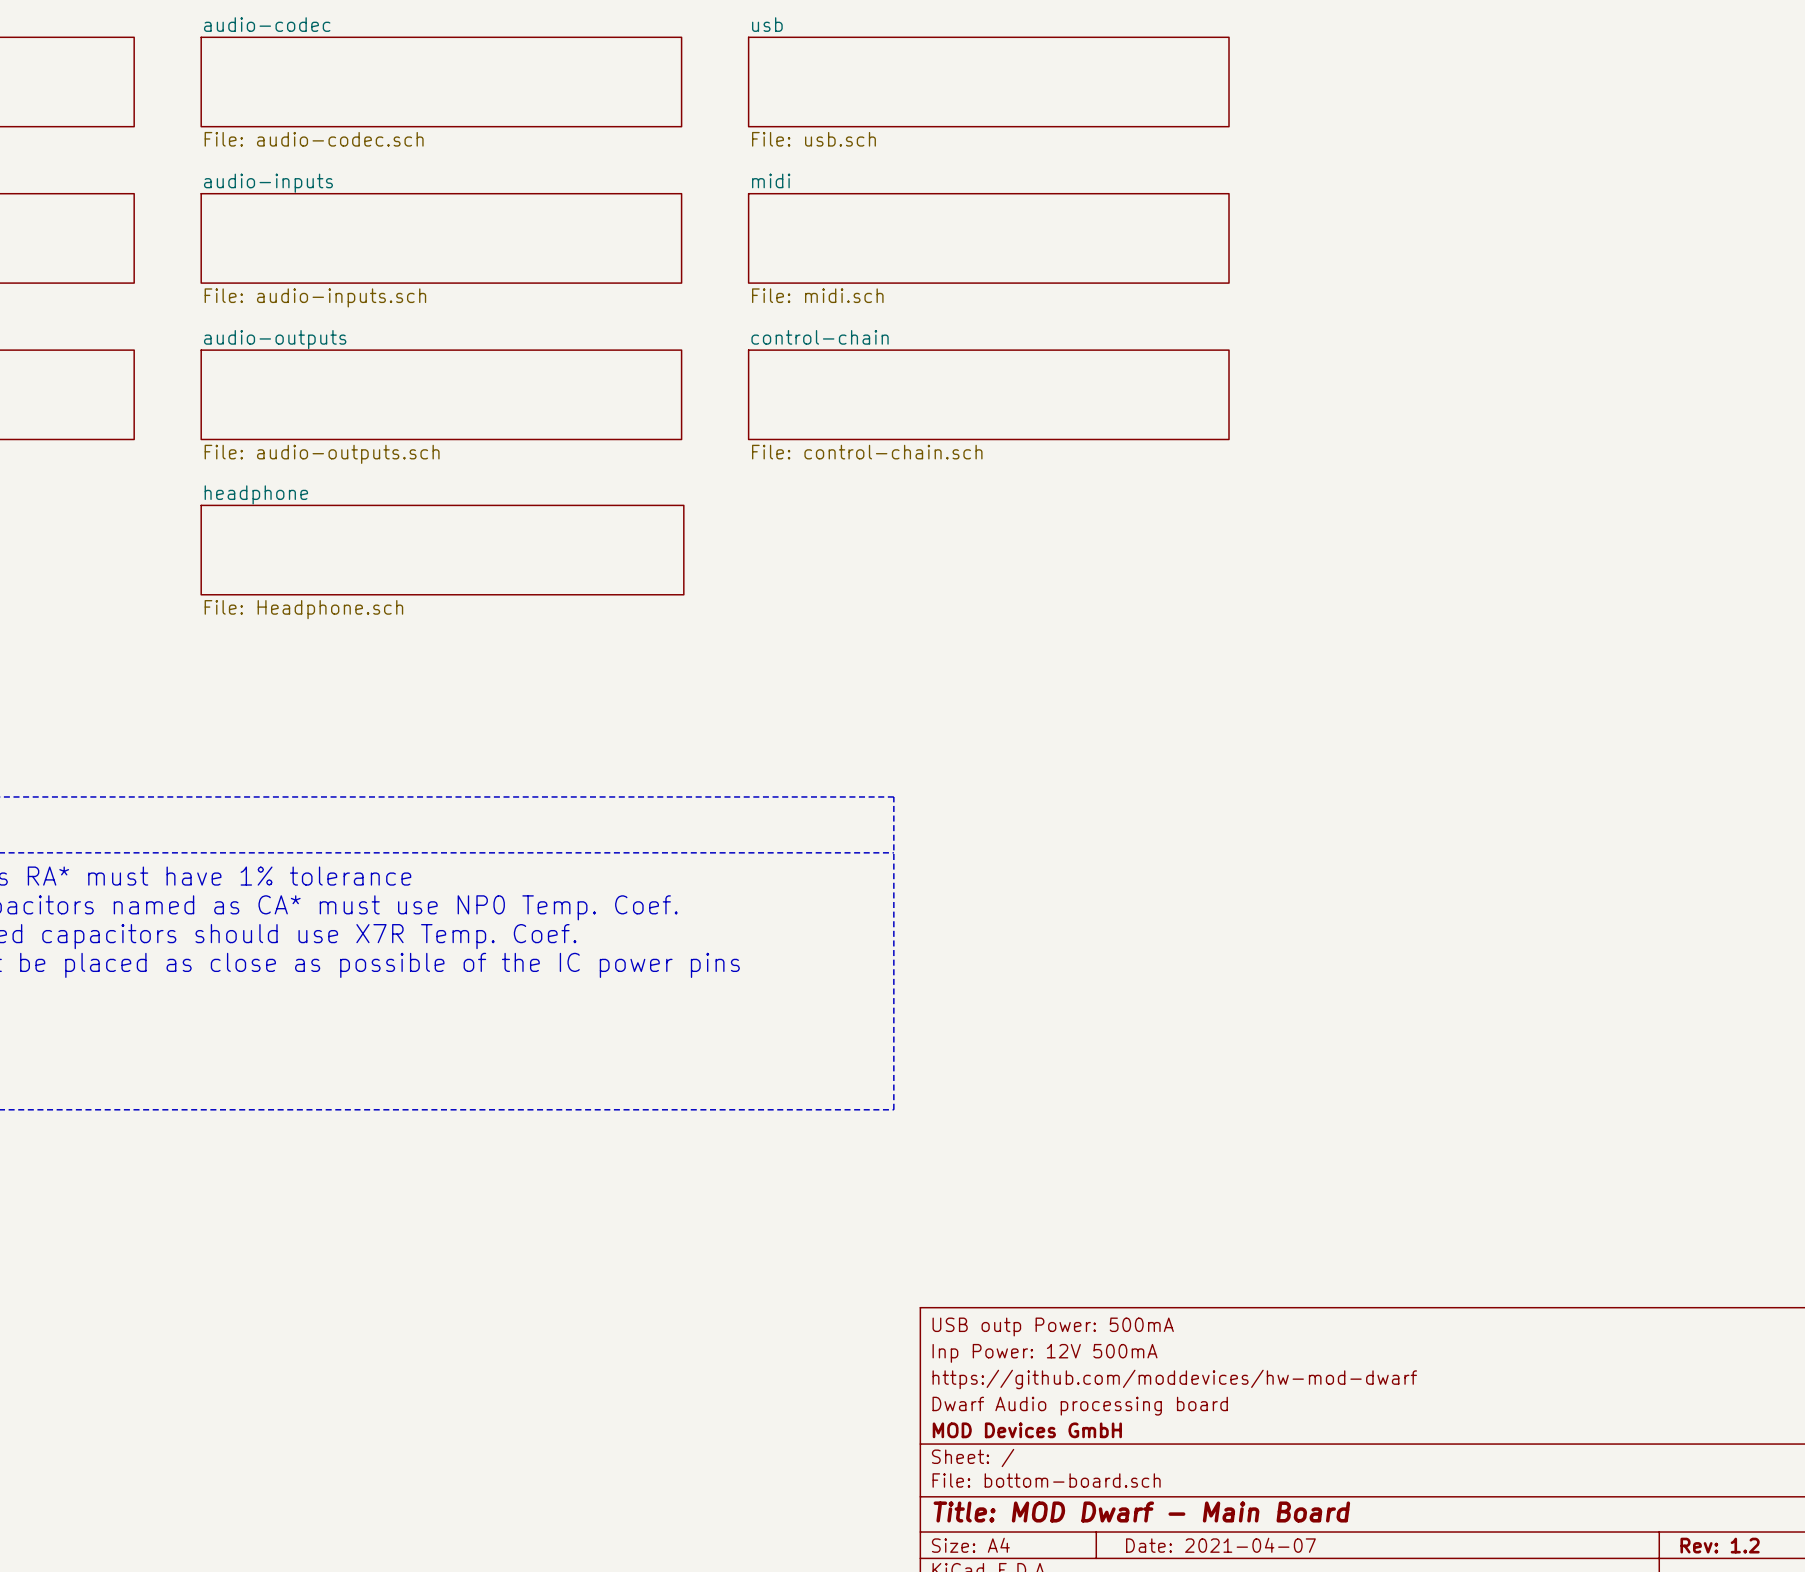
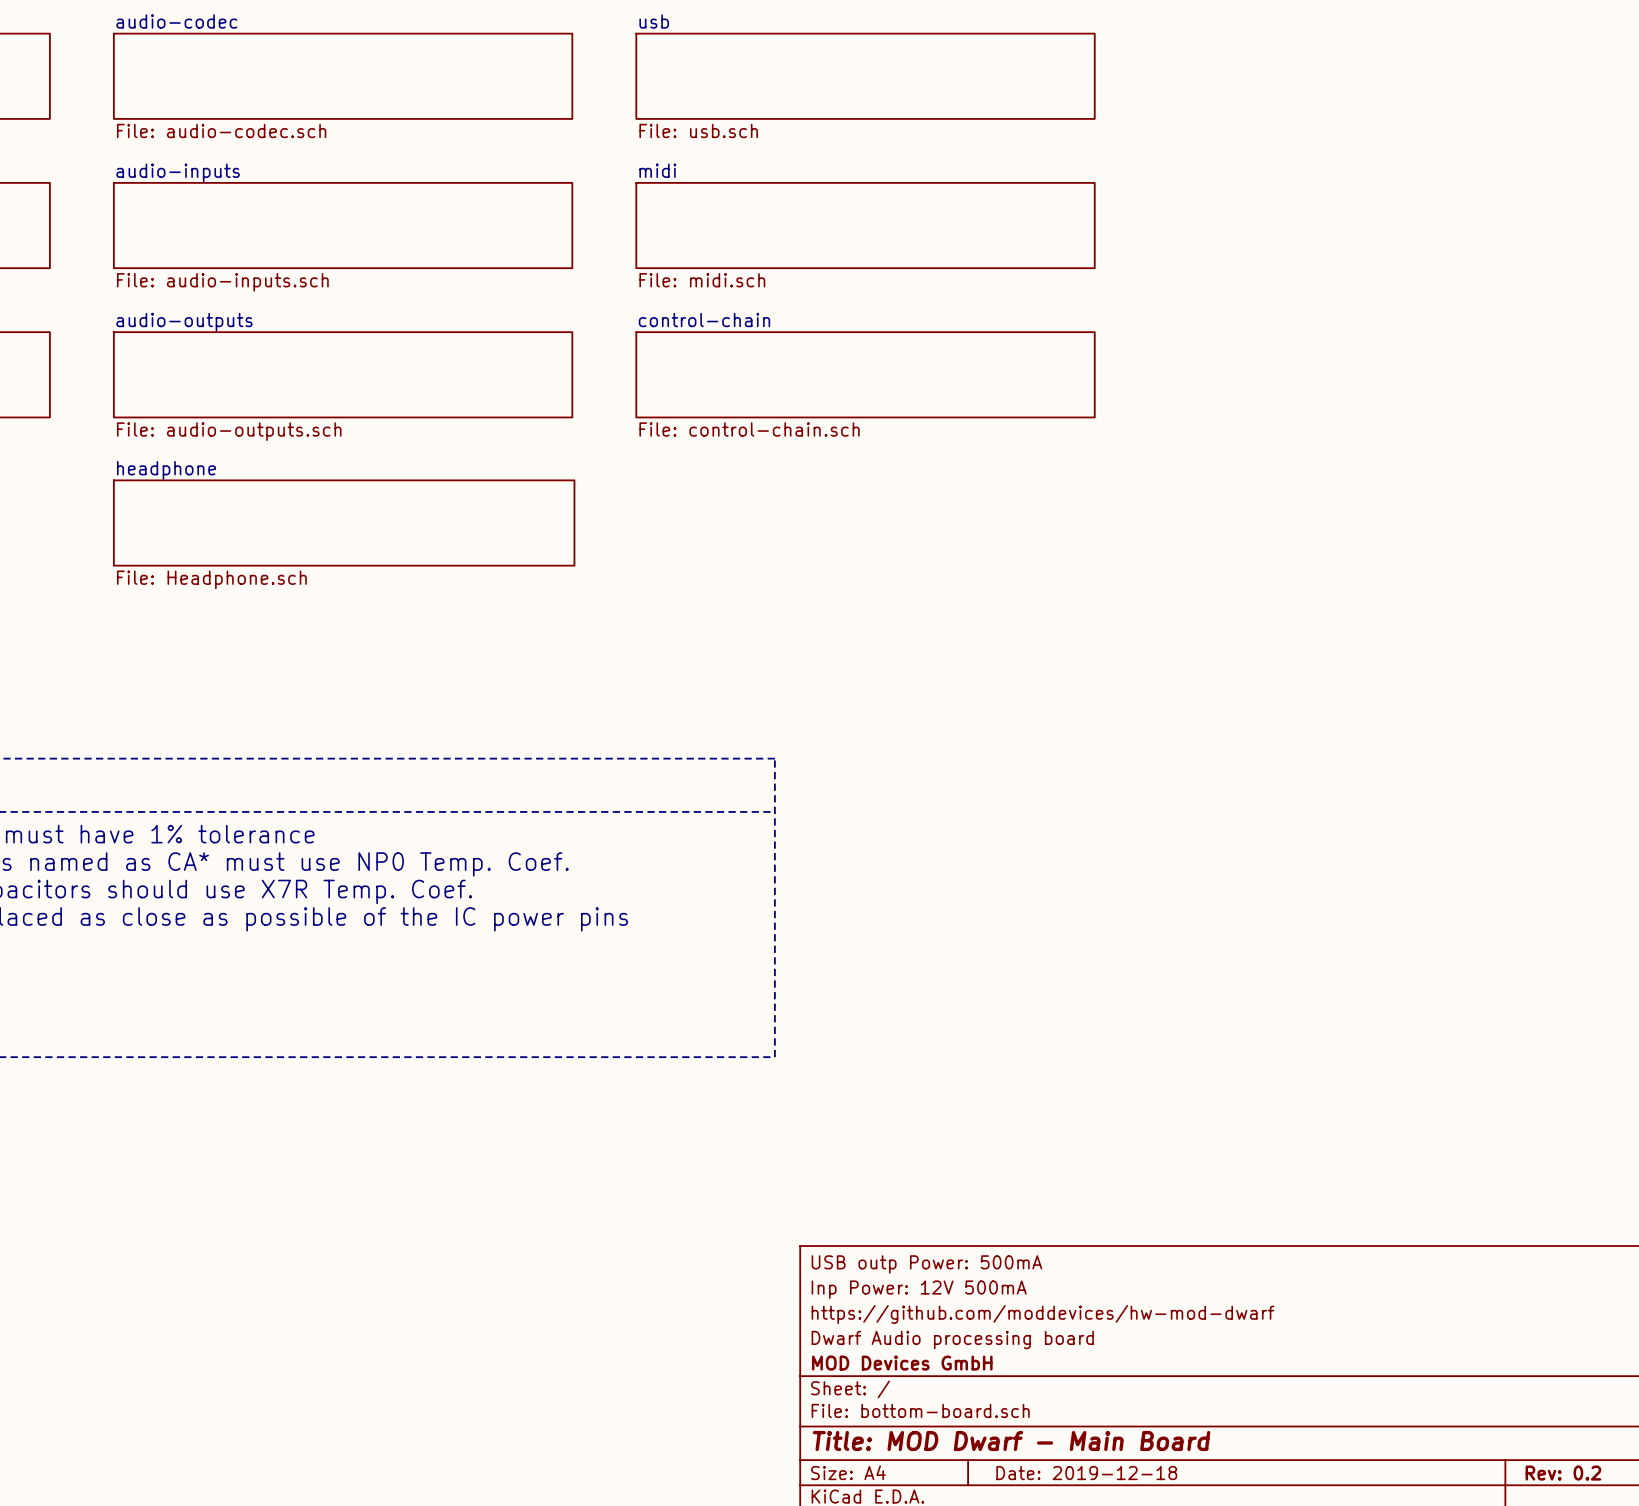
title block: Date: 2021-04-07 (1220, 1545) -> Date: 2019-12-18 (1086, 1473)
title block: Rev: 1.2 (1720, 1545) -> Rev: 0.2 (1563, 1473)

